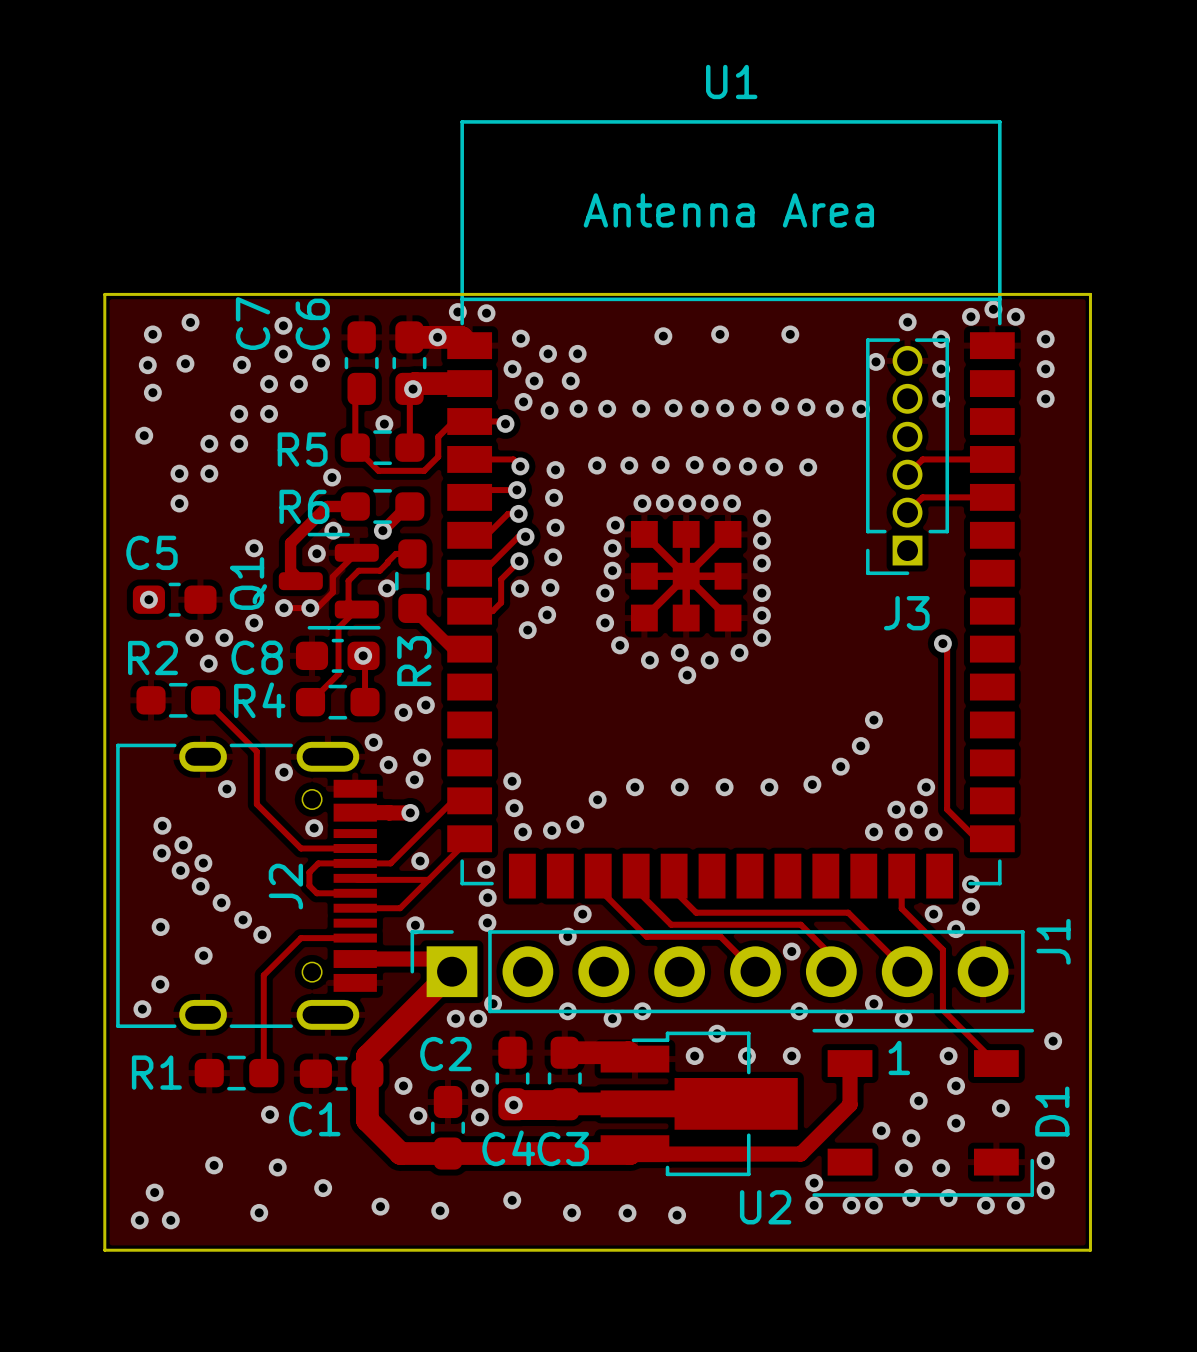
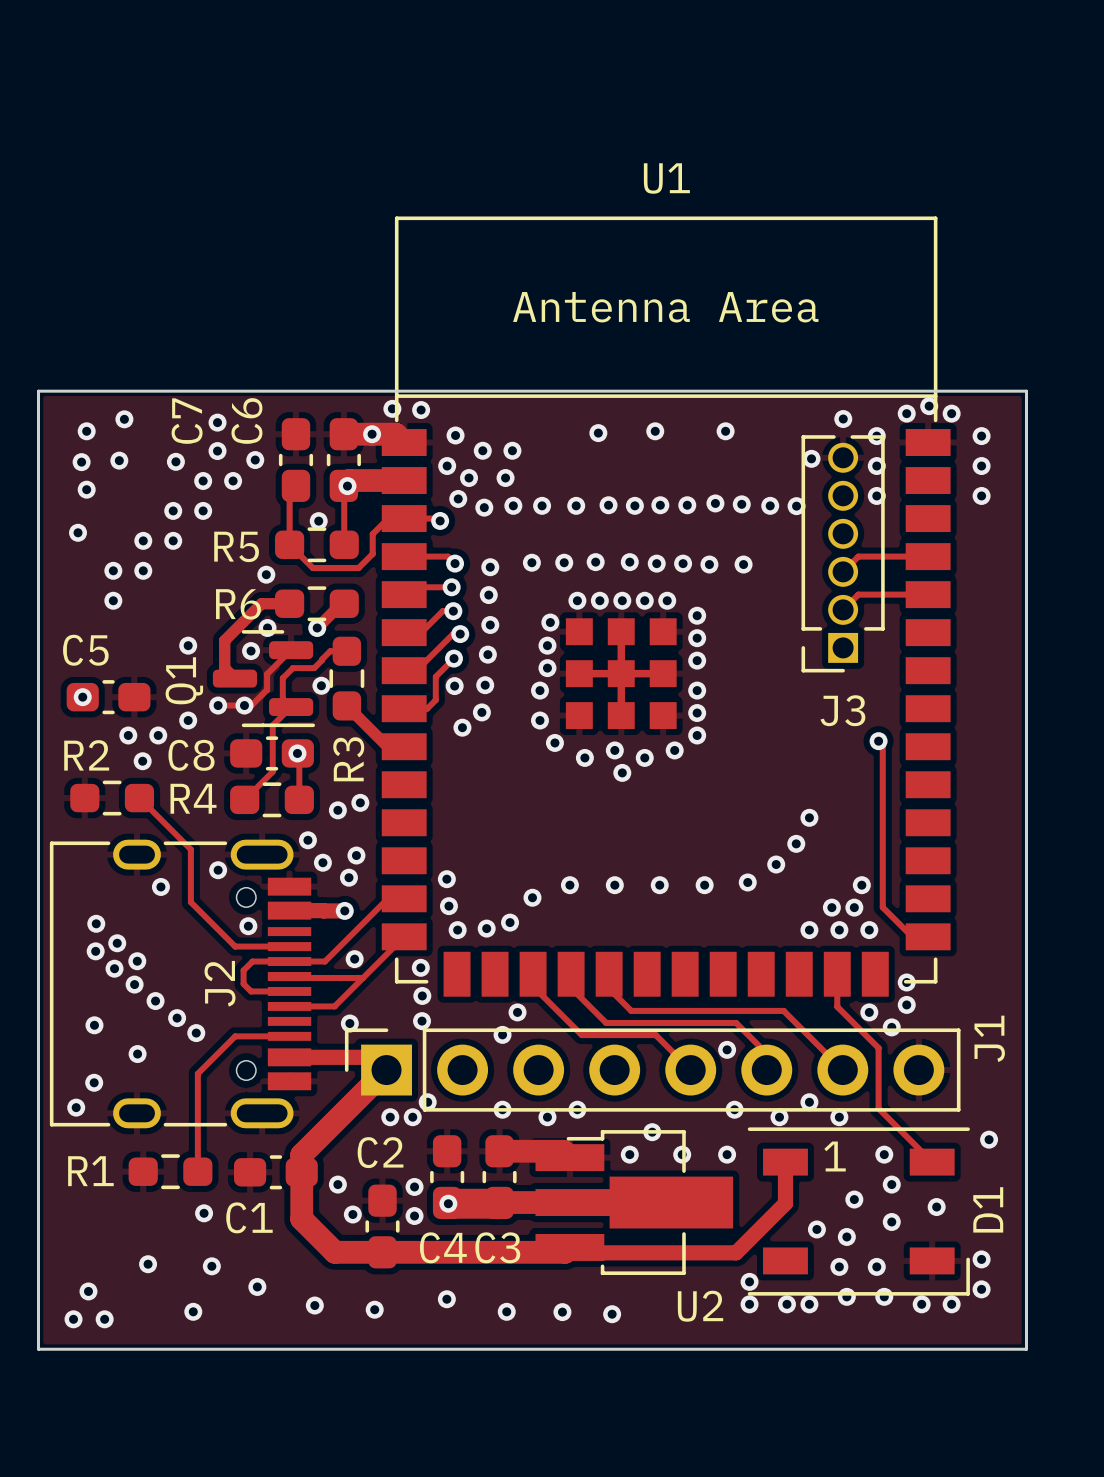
track: (644, 534) (728, 618) -> none
track: (728, 534) (644, 618) -> none

